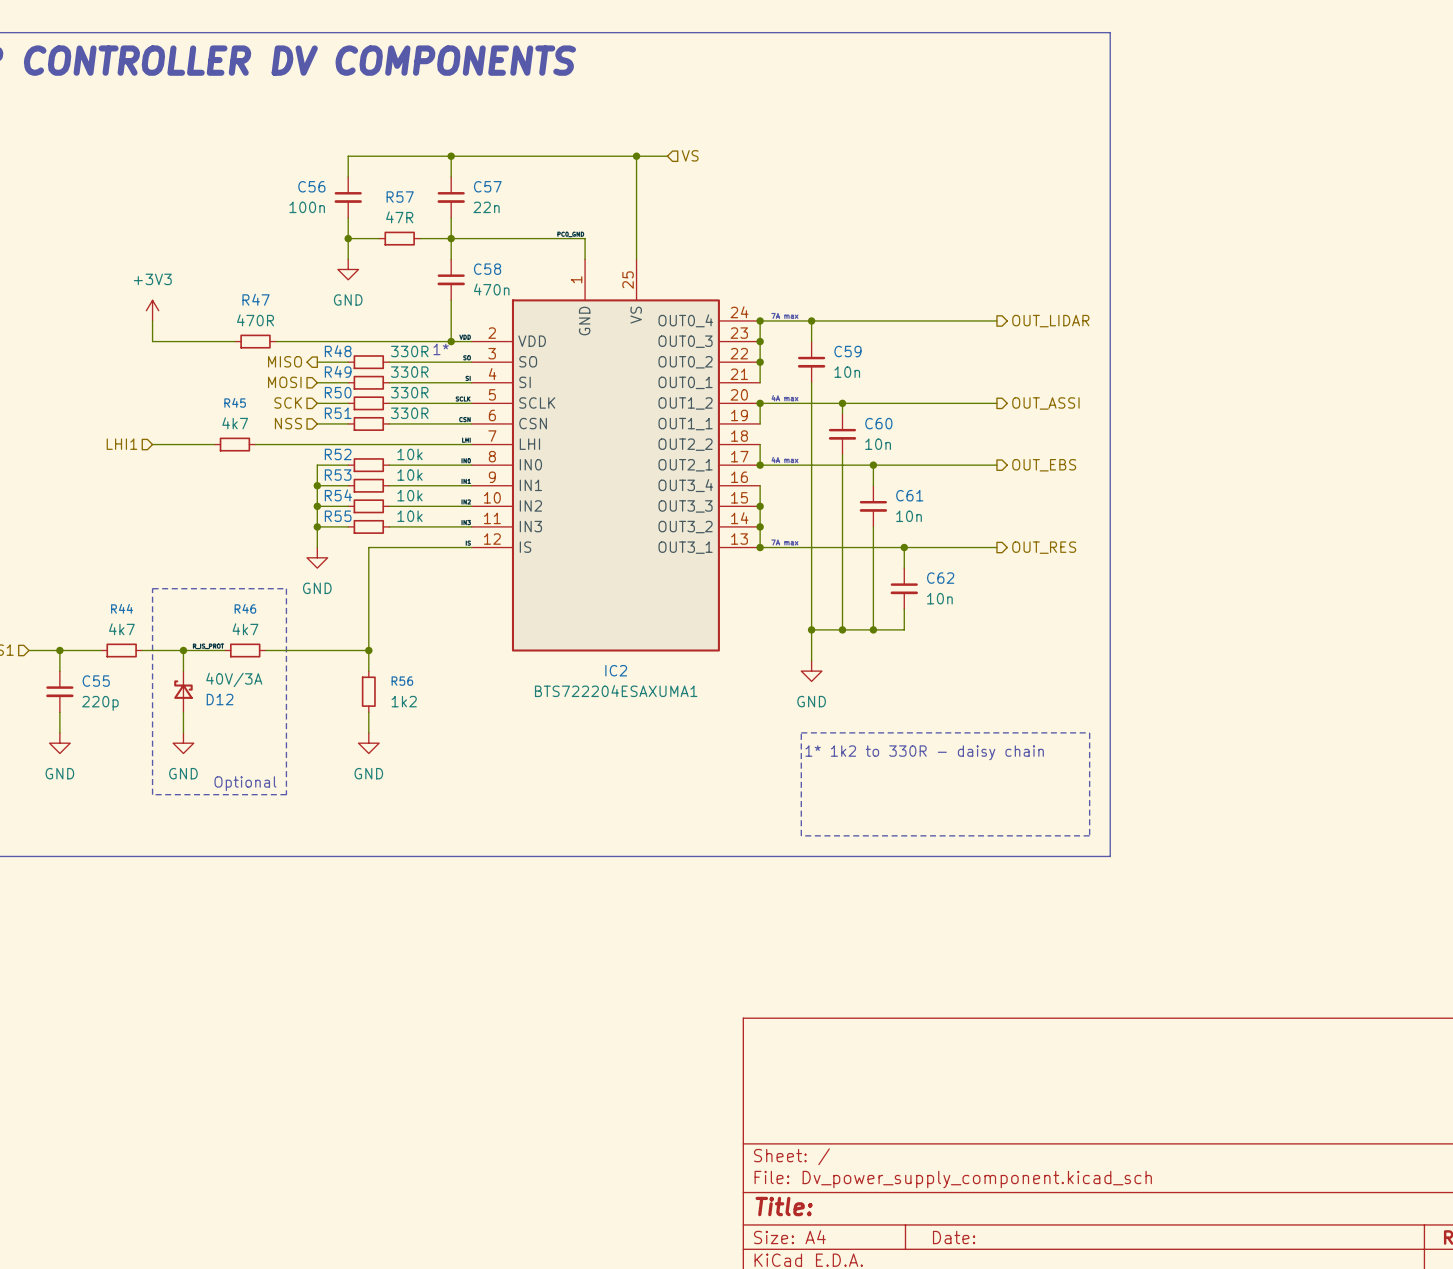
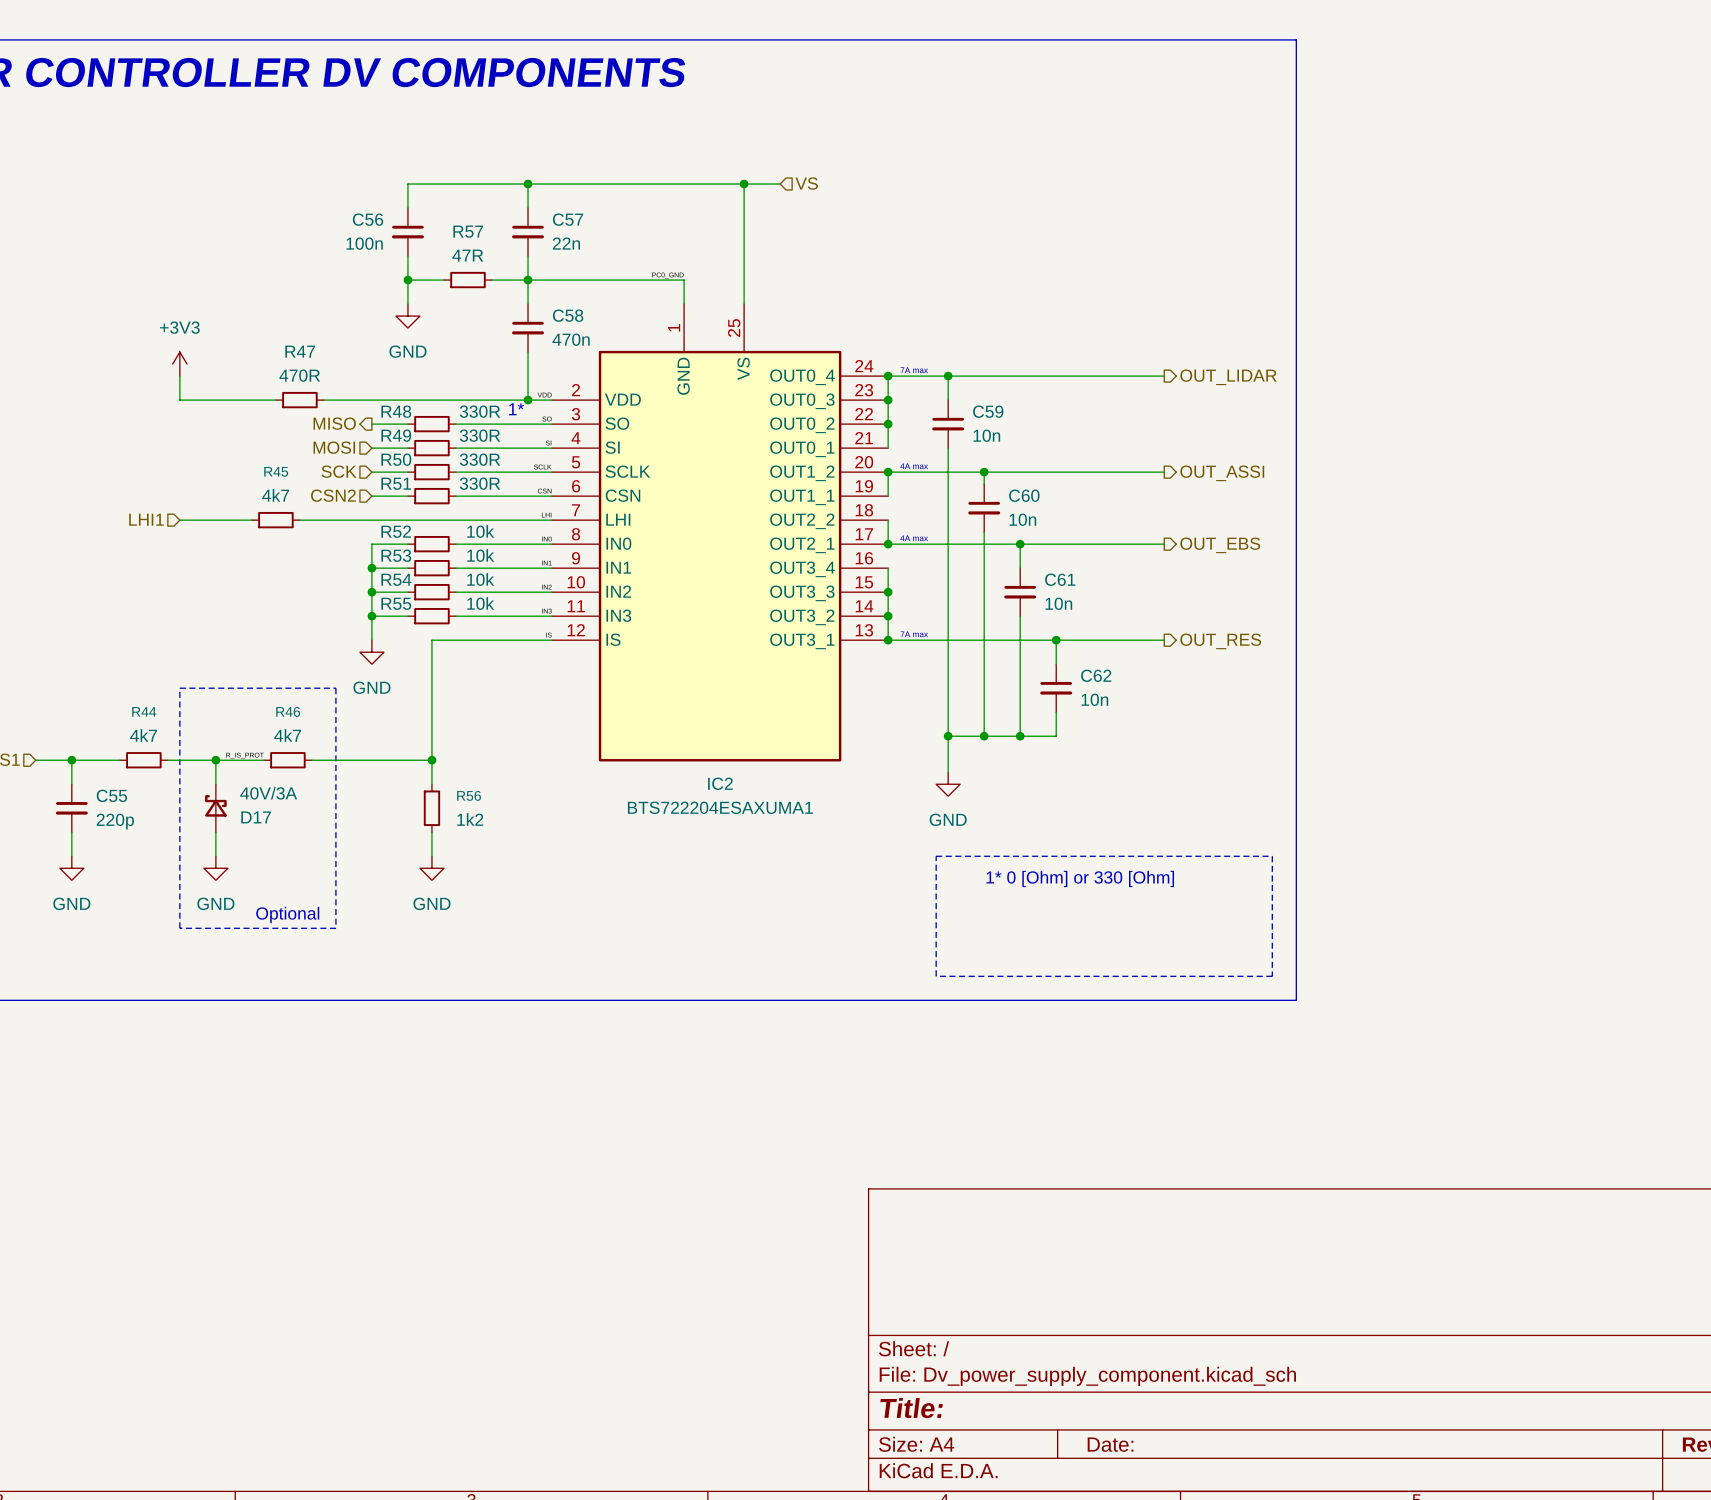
hierarchical label: NSS (288, 423) -> CSN2 (333, 495)
D12 name: D12 (220, 699) -> D17 (256, 817)
text: 1* 1k2 to 330R - daisy chain (924, 752) -> 1* 0 [Ohm] or 330 [Ohm] (1080, 878)

